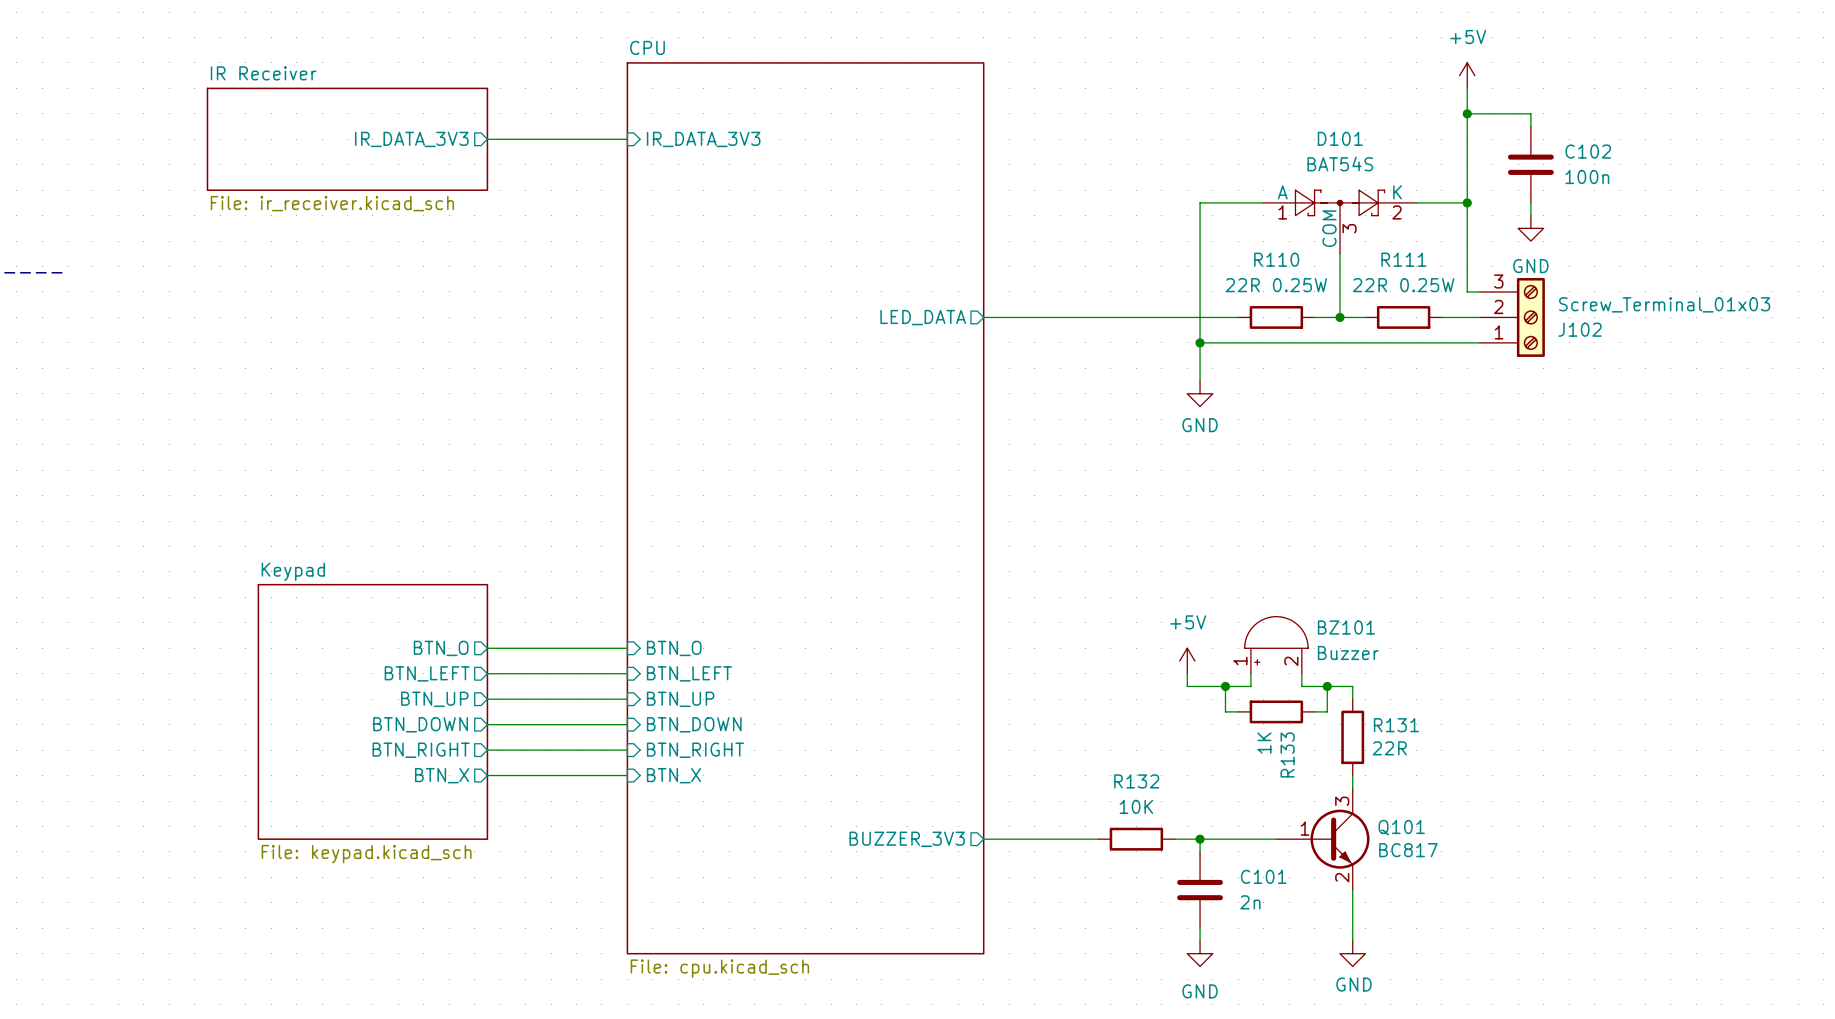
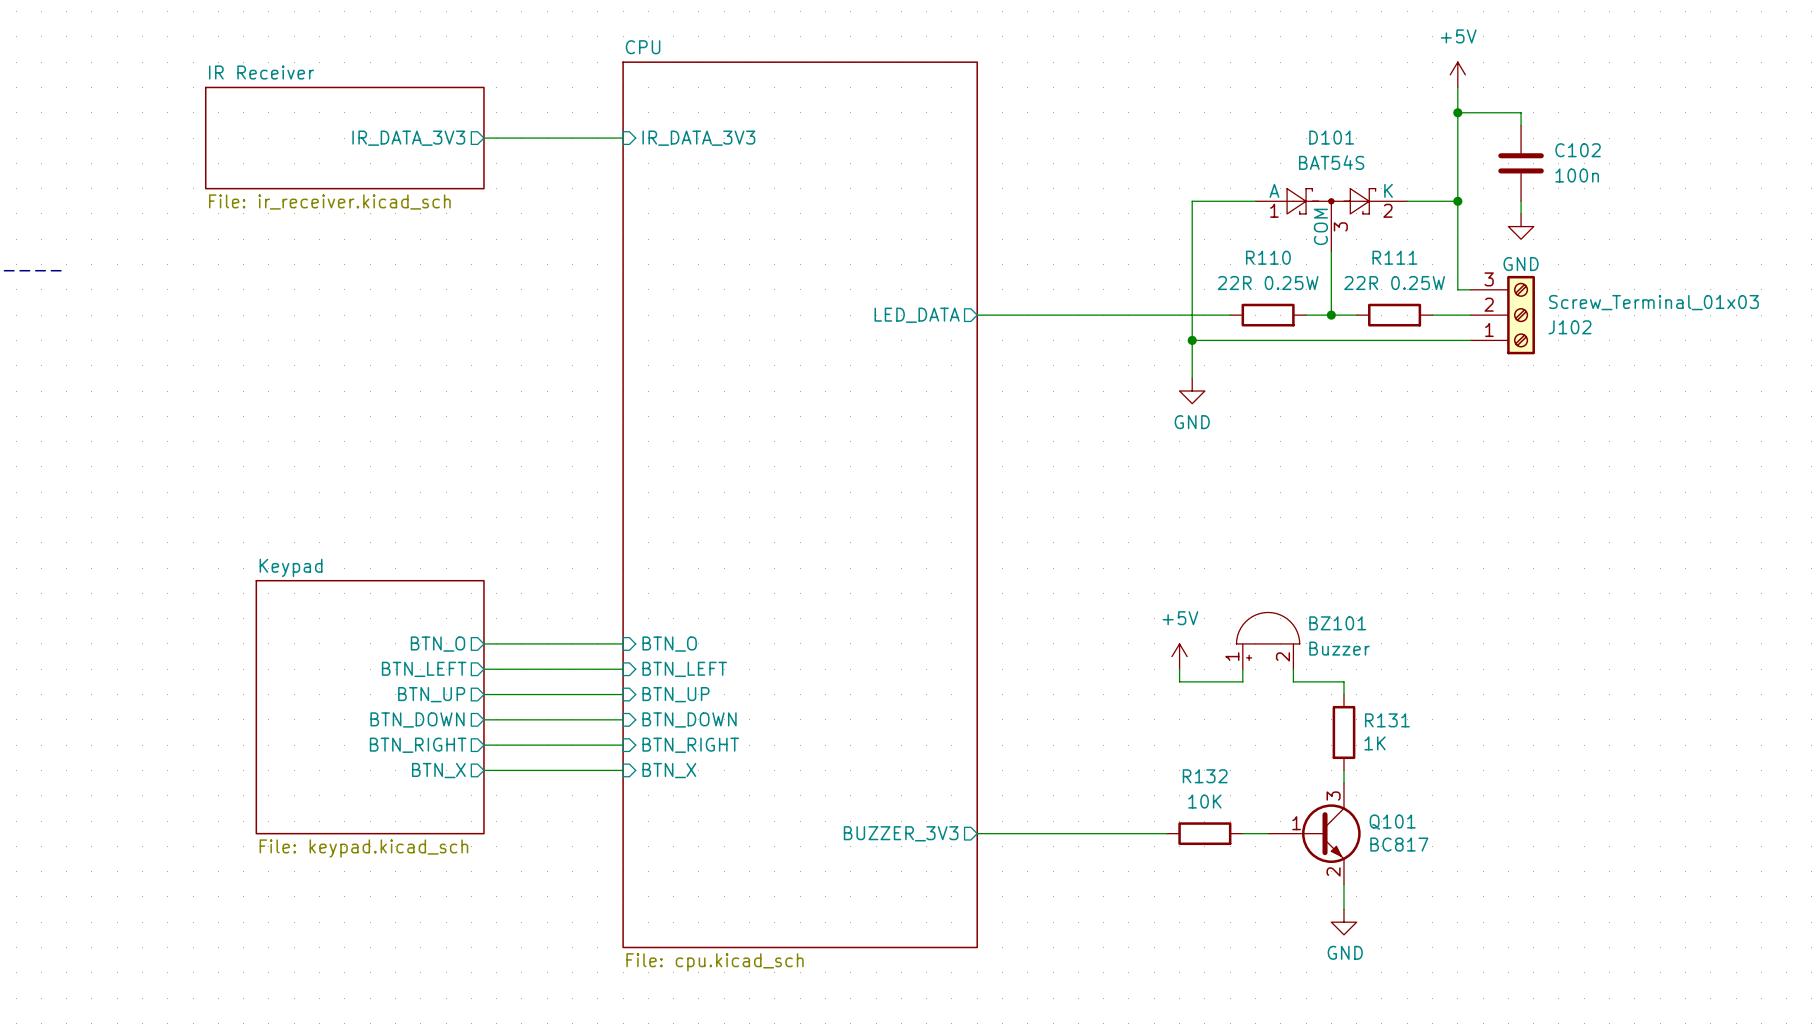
wire: (1225, 686) (1225, 711) (1238, 711) -> none
junction: (1225, 686) -> none
wire: (1327, 686) (1327, 711) (1314, 711) -> none
junction: (1327, 686) -> none
R133: 1K (1276, 711) -> none
R131 value: 22R (1389, 748) -> 1K (1375, 743)
R132 position: (1136, 839) -> (1204, 833)
wire: (1174, 839) (1250, 839) -> (1166, 833) (1091, 833)
wire: (1200, 839) (1200, 851) -> none
junction: (1200, 839) -> none
C101: 2n (1200, 890) -> none
wire: (1200, 928) (1200, 940) -> none
power symbol: GND (1200, 953) -> none
power symbol position: GND (1352, 953) -> GND (1343, 922)

